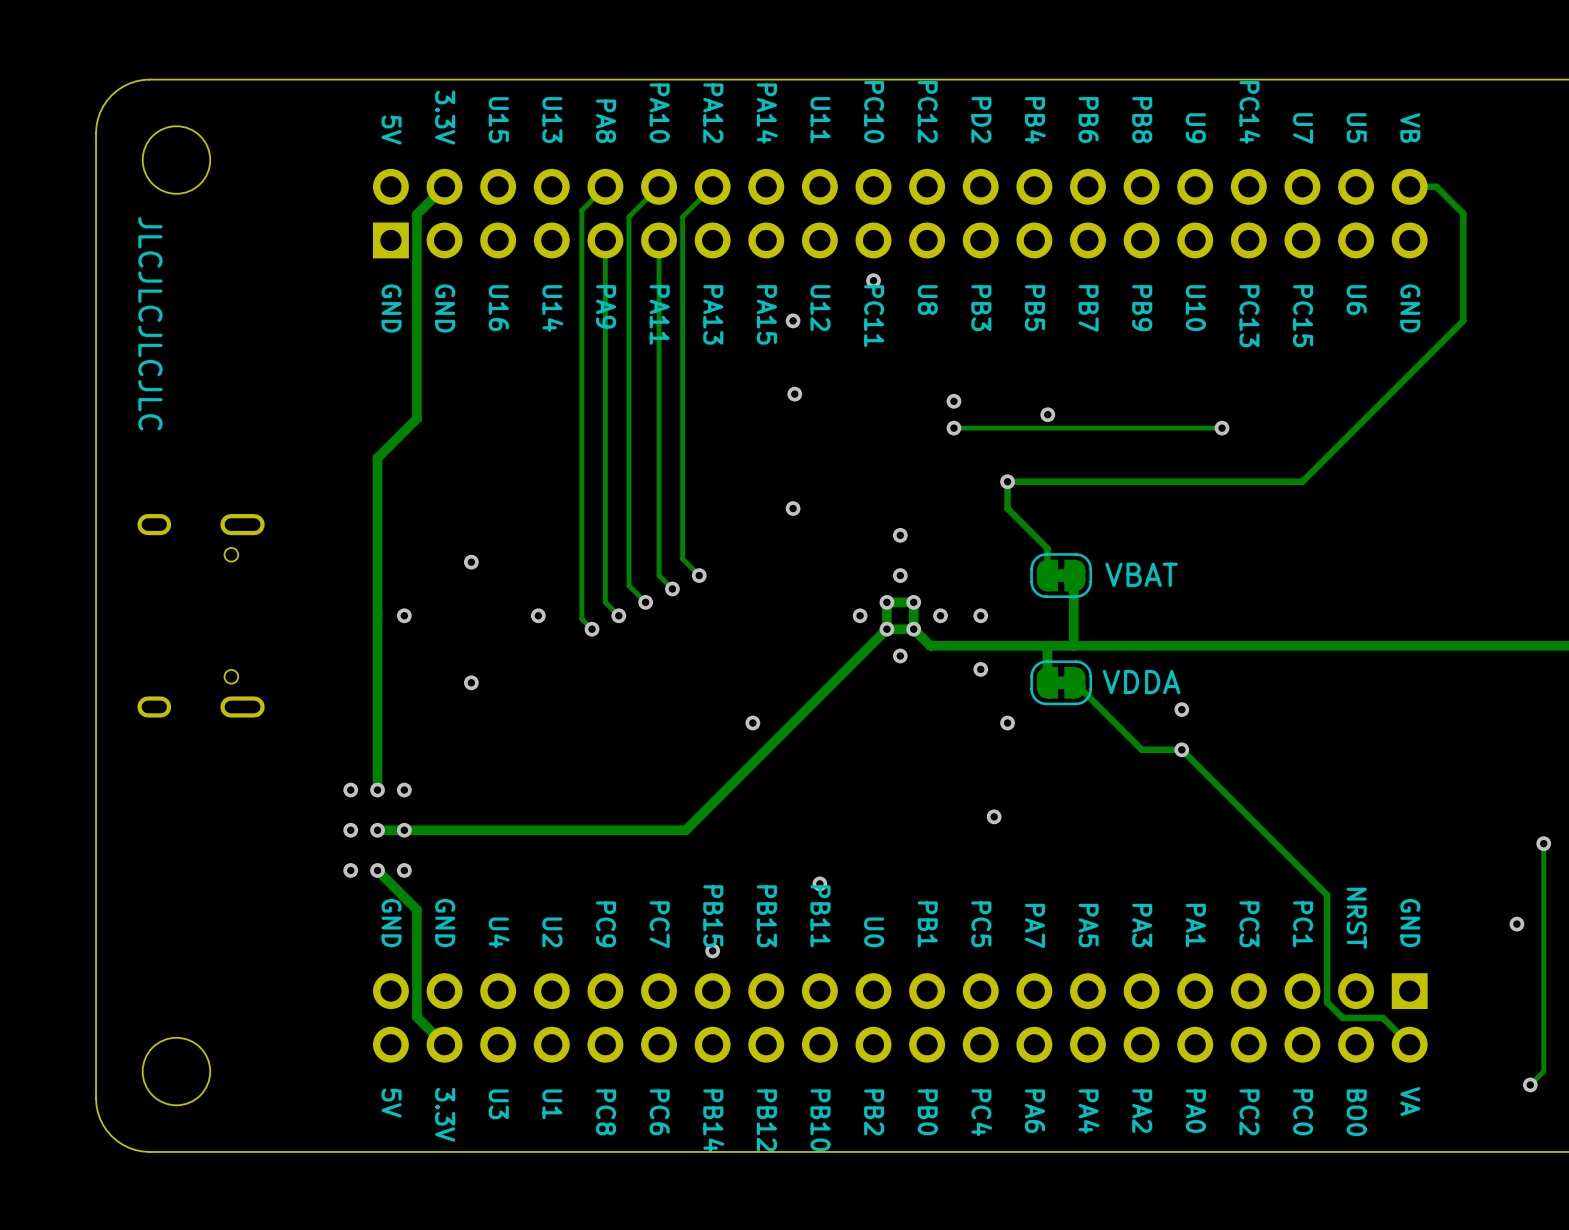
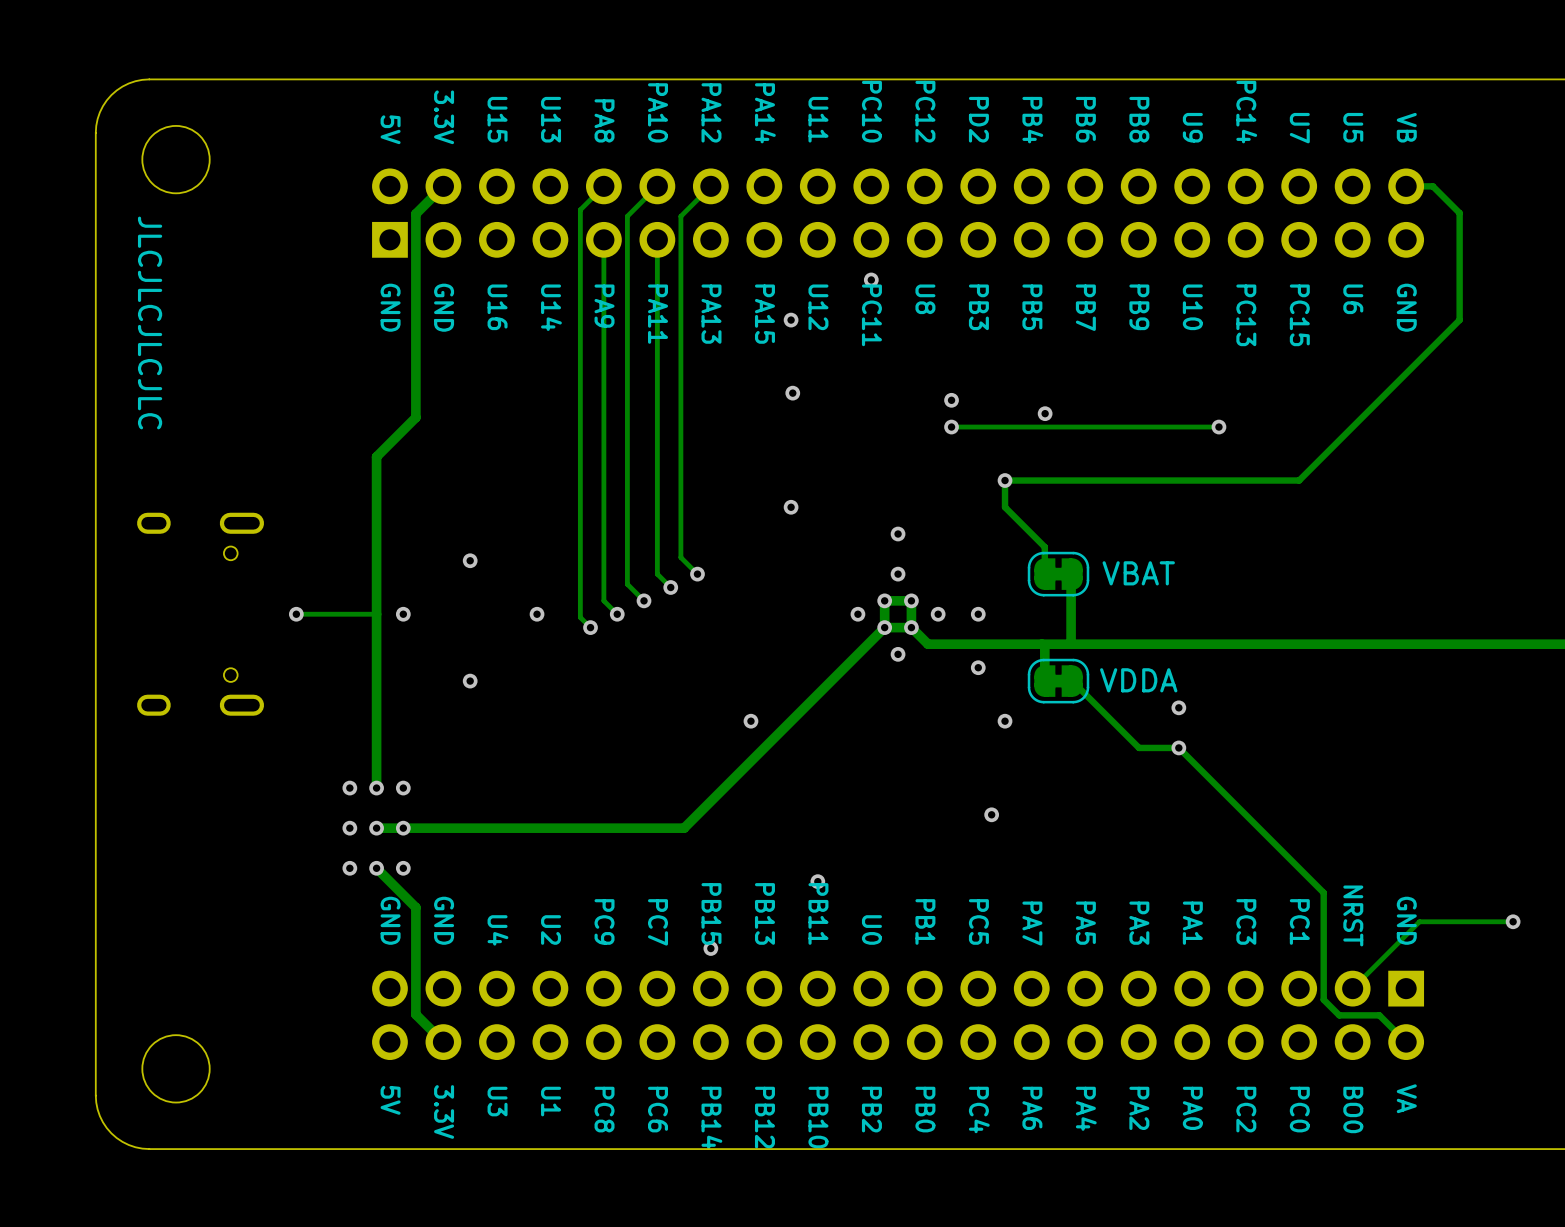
via: none -> (296, 614)
track: none -> (376, 614) (296, 614)
track: (1543, 843) (1543, 1071) (1530, 1084) -> none
via: (1543, 843) -> none
track: none -> (1513, 921) (1419, 921) (1352, 988)
via: (1530, 1084) -> none

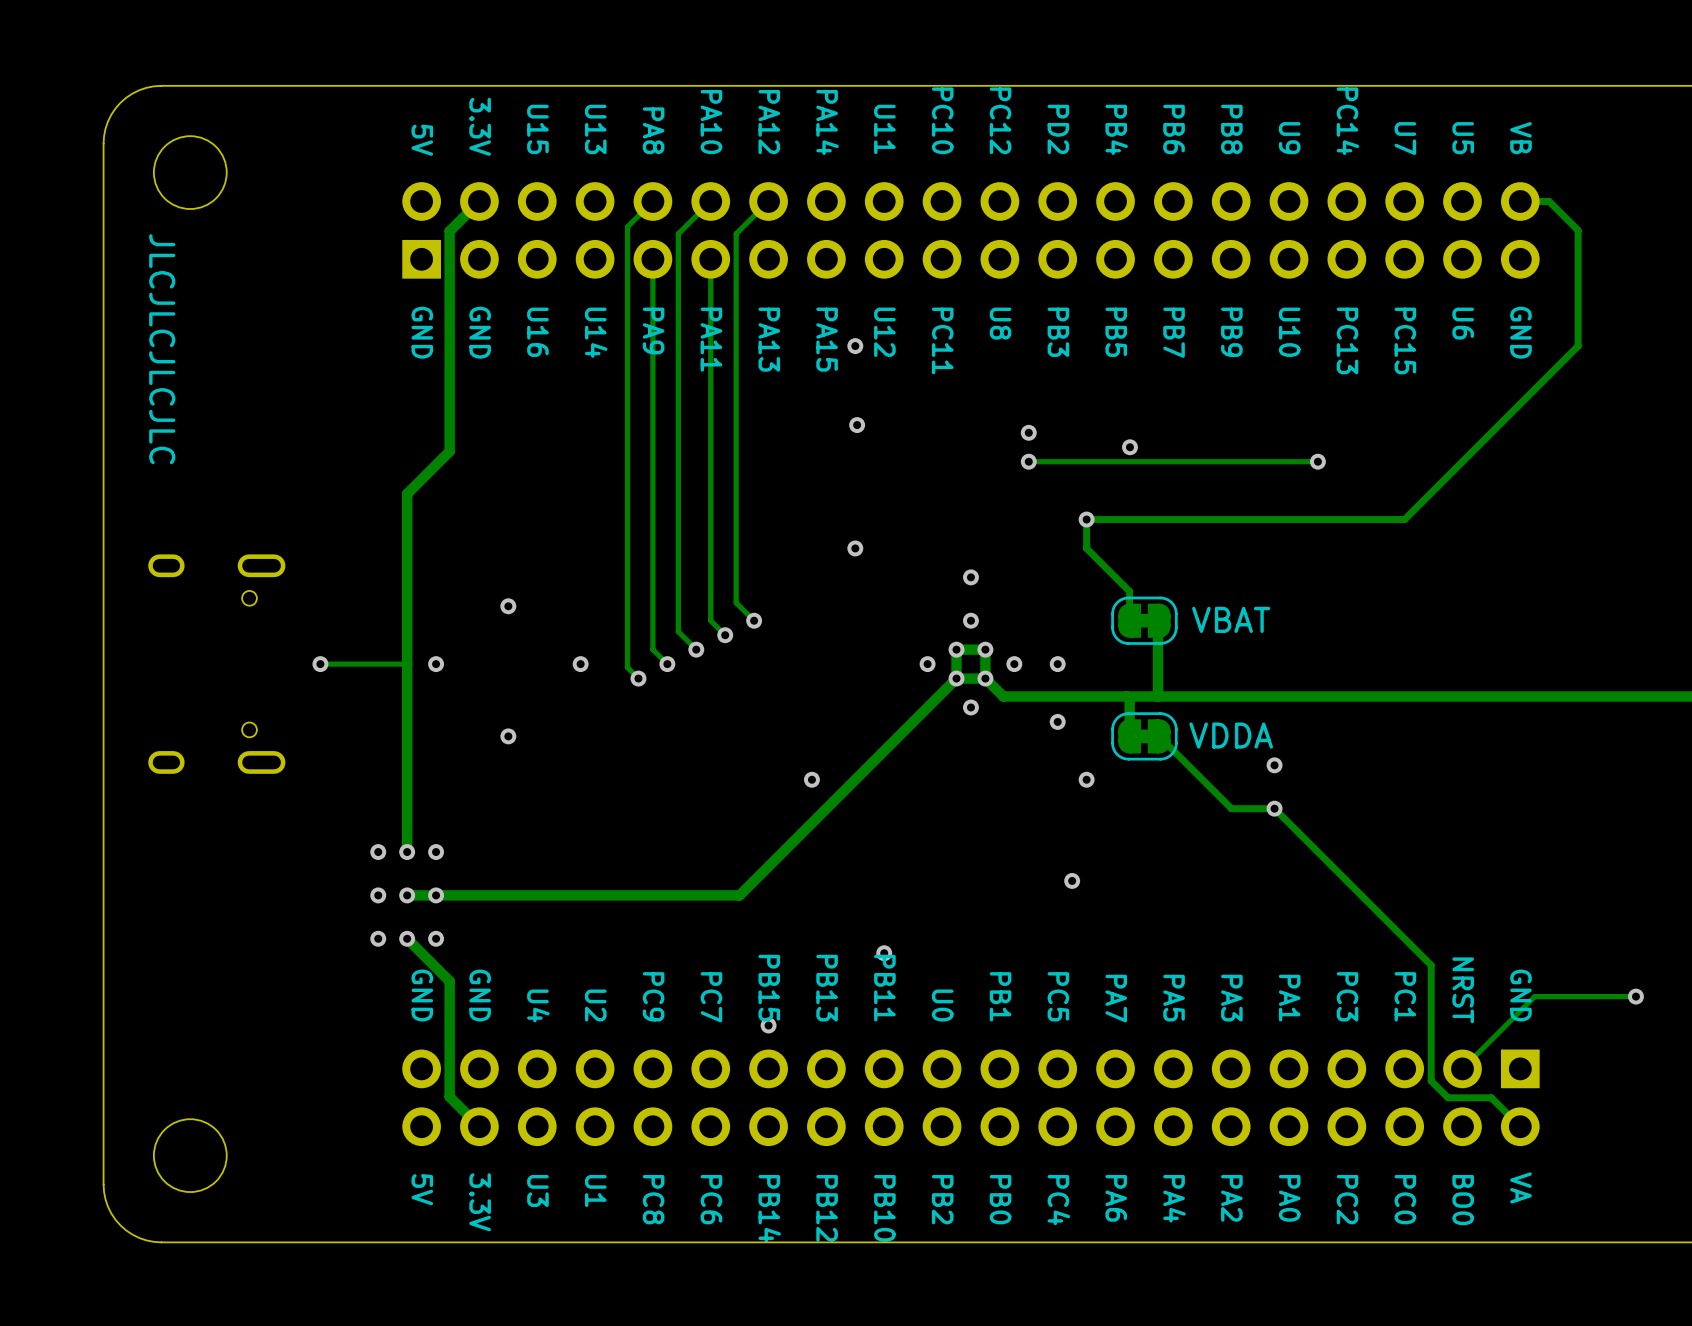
via: (871, 279) -> none

